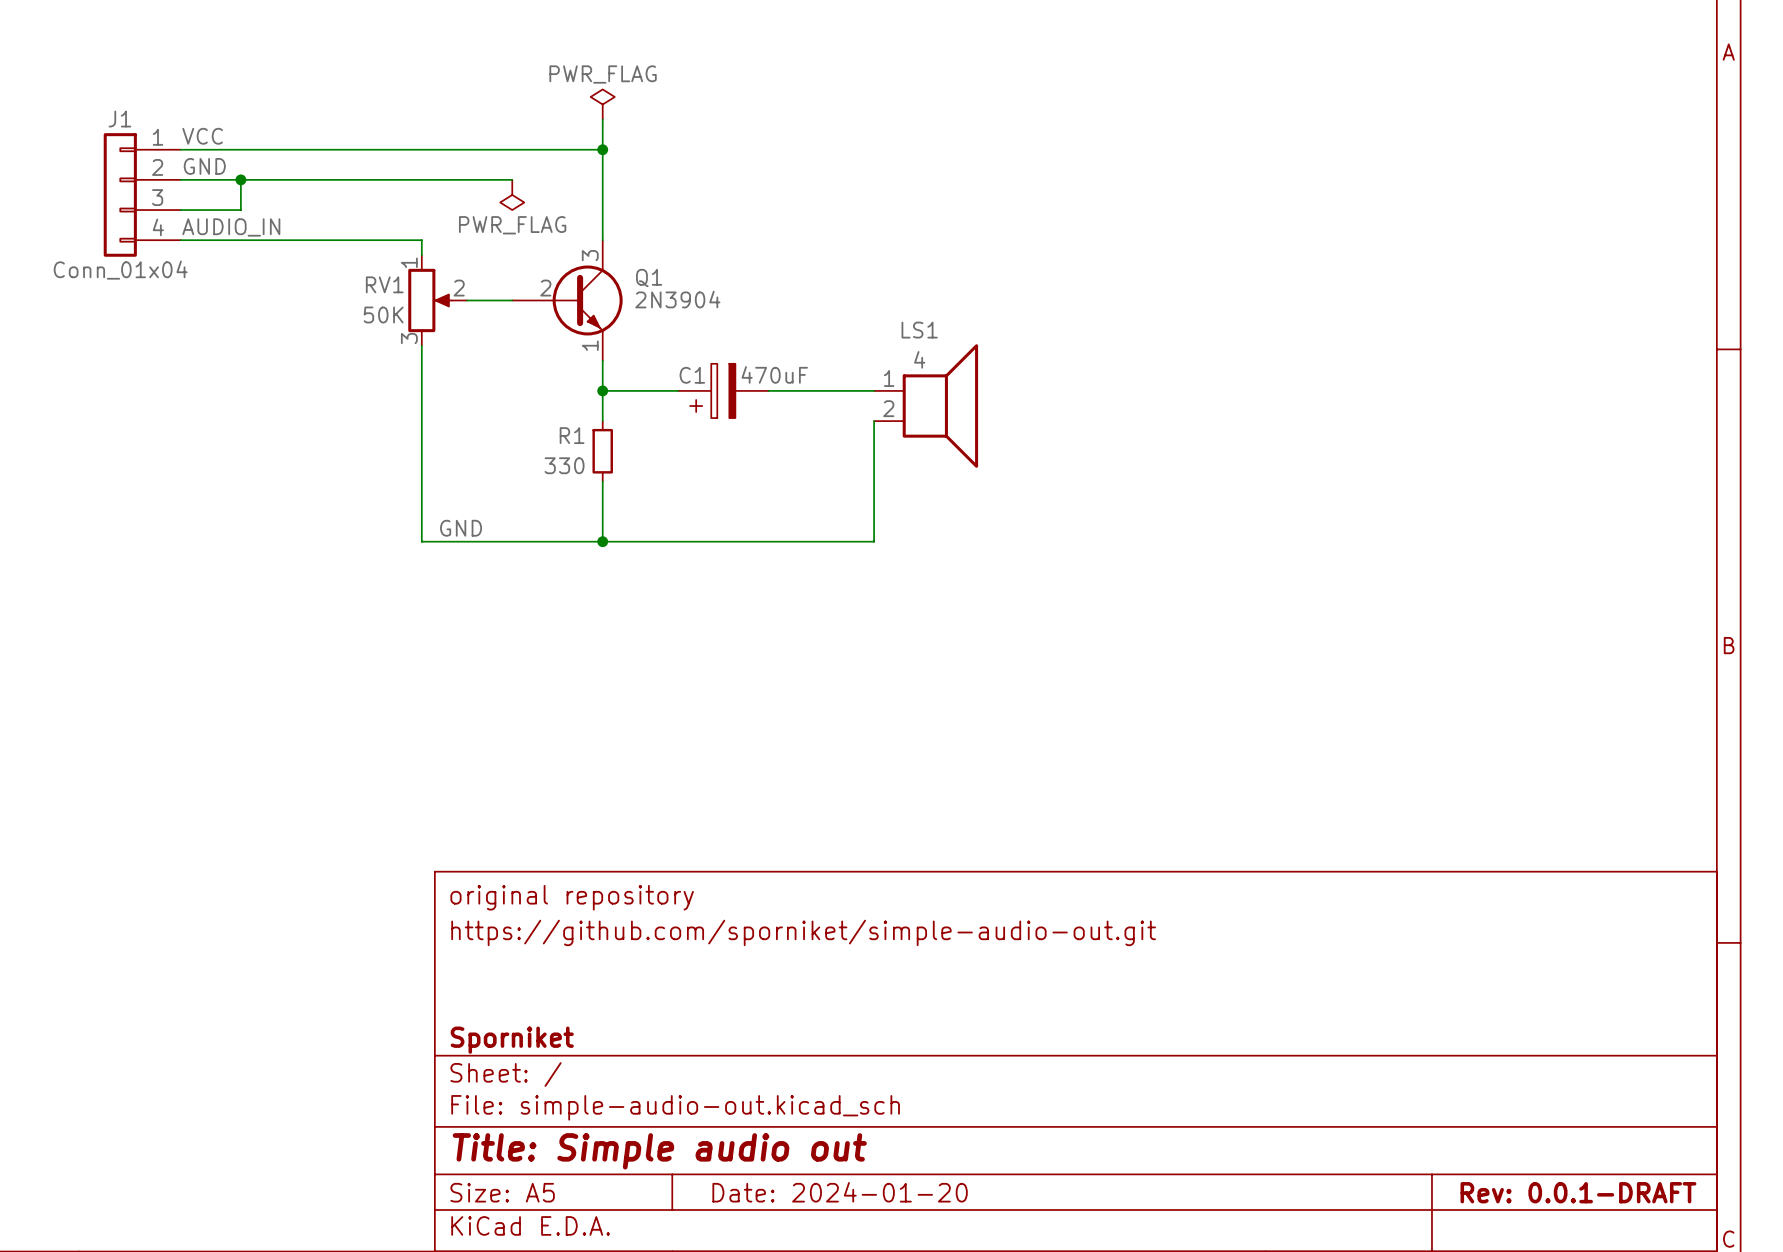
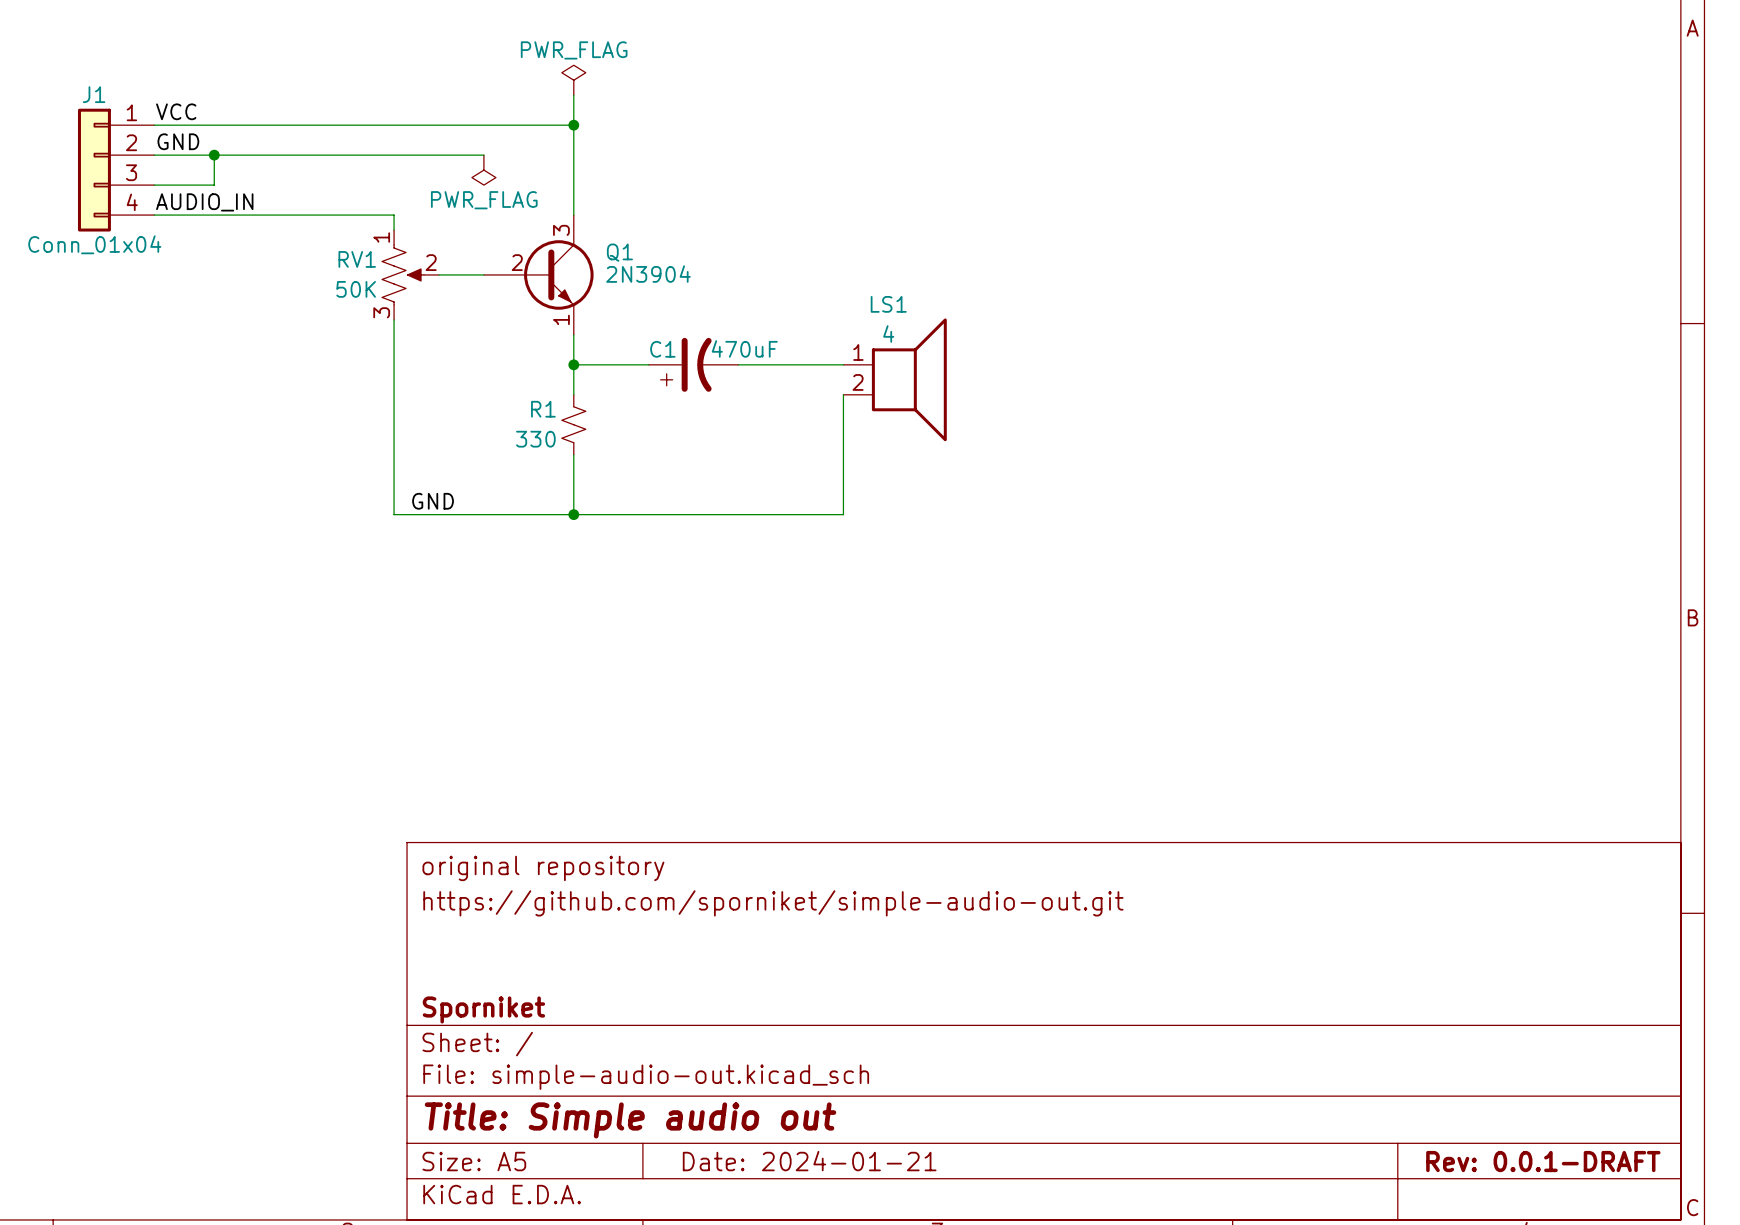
RV1 symbol: [408, 255, 468, 346] -> [382, 230, 439, 320]
C1 symbol: [678, 363, 769, 419] -> [648, 337, 739, 392]
R1 symbol: [592, 421, 613, 482] -> [561, 394, 586, 455]
title block: Date: 2024-01-20 (840, 1192) -> Date: 2024-01-21 (809, 1161)

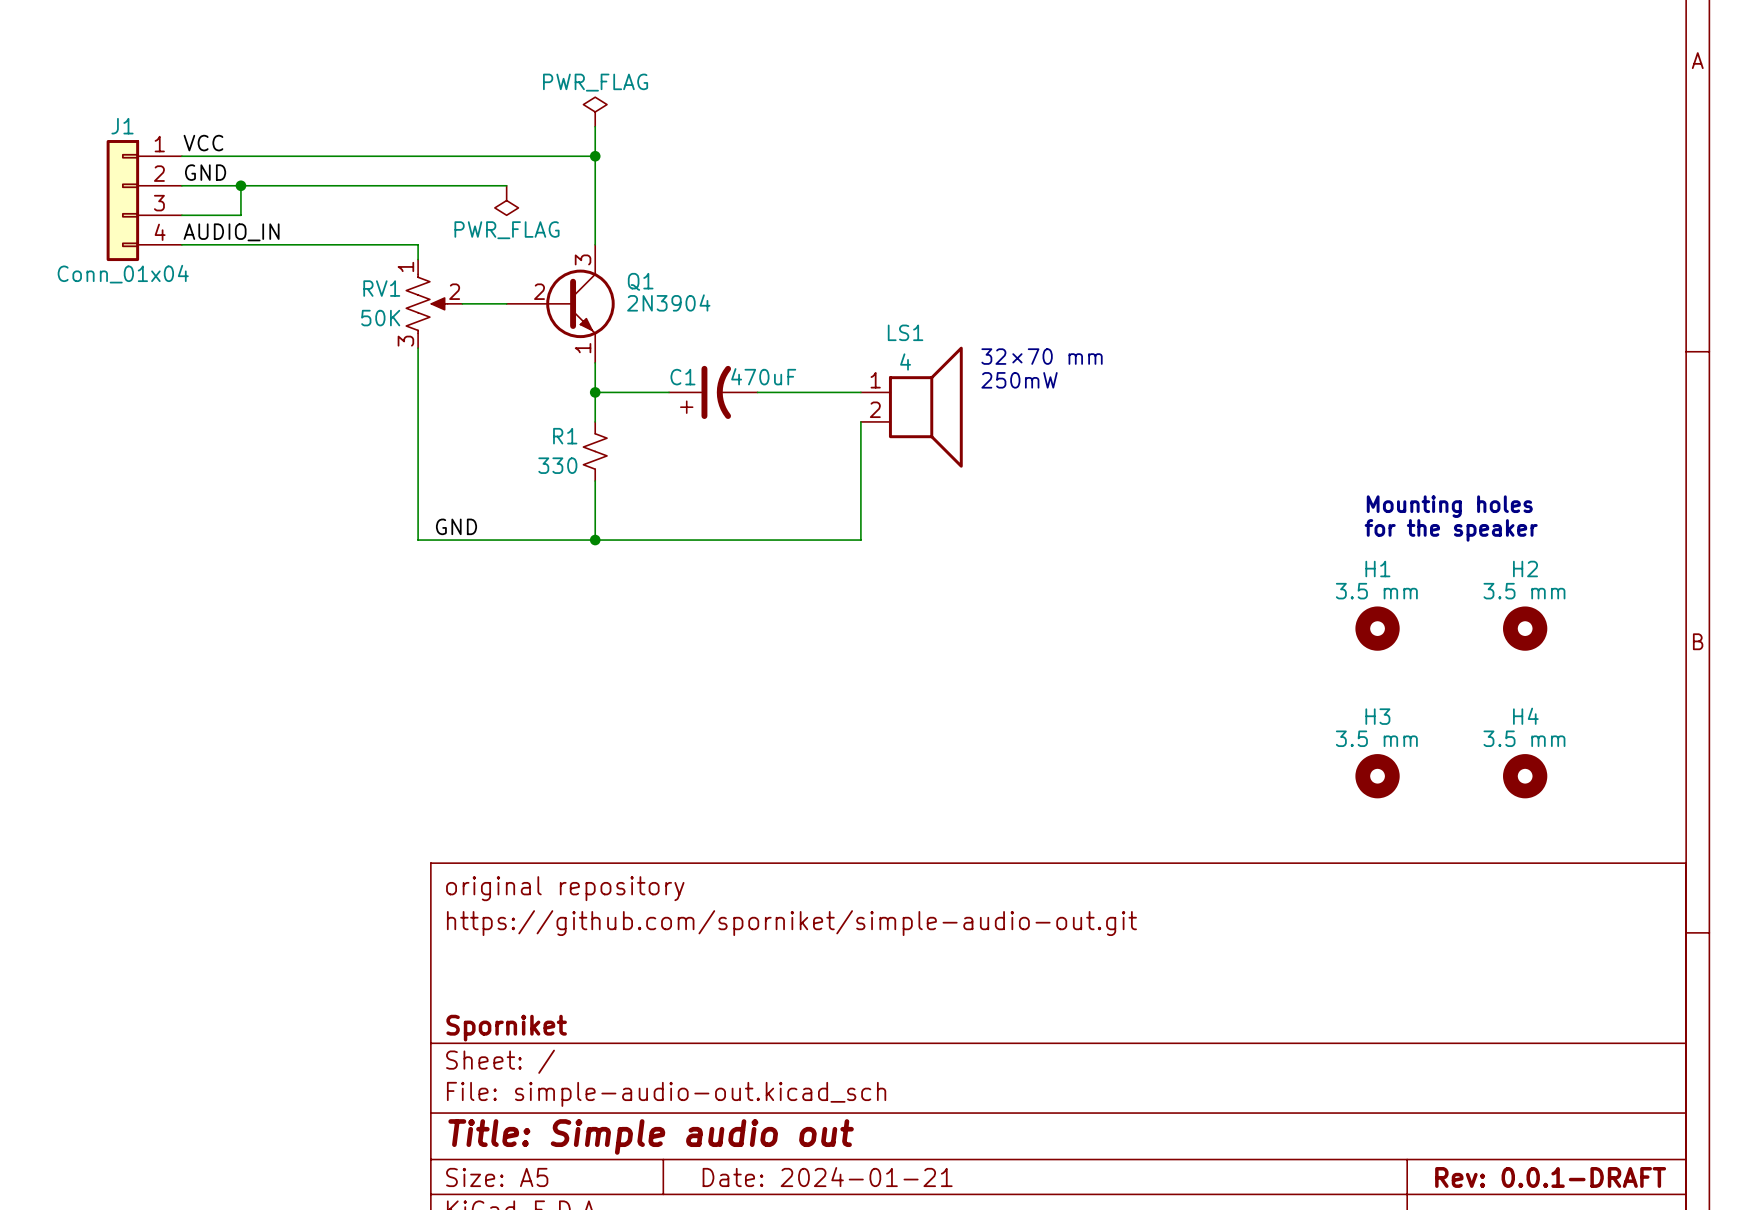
text: none -> 32×70 mm (1042, 356)
text: none -> 250mW (1019, 380)
text: none -> Mounting holes (1449, 506)
text: none -> for the speaker (1451, 530)
H1: none -> 3.5 mm (1377, 628)
H2: none -> 3.5 mm (1525, 628)
H3: none -> 3.5 mm (1377, 776)
H4: none -> 3.5 mm (1525, 776)

